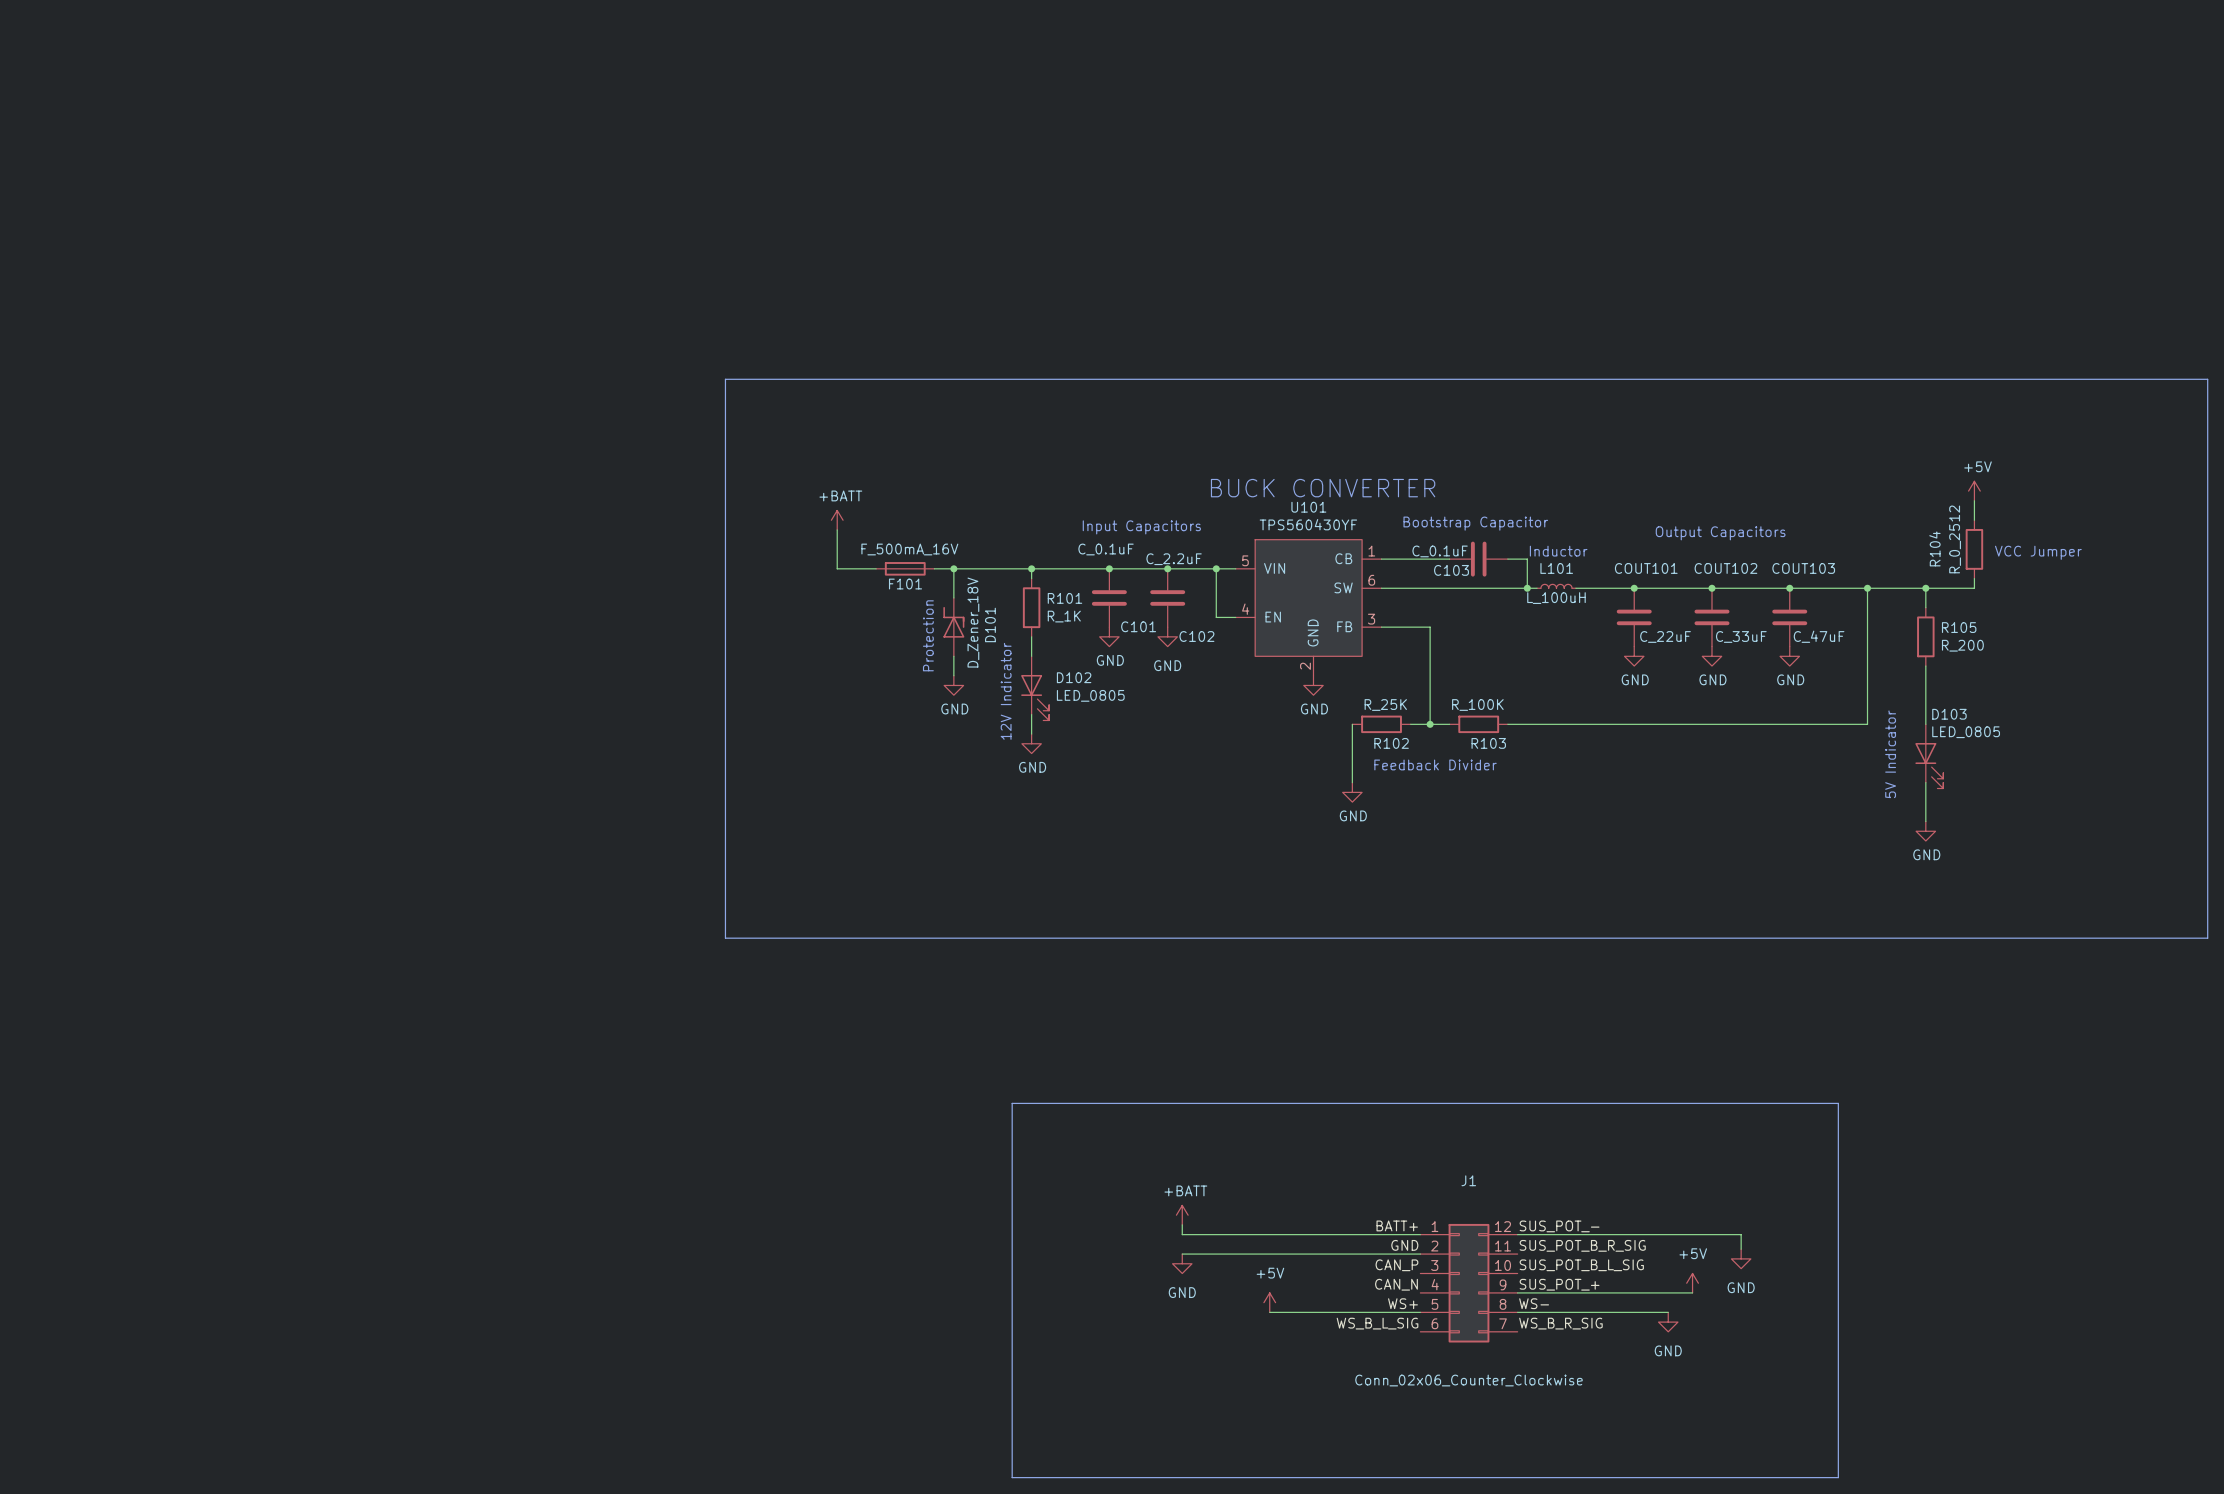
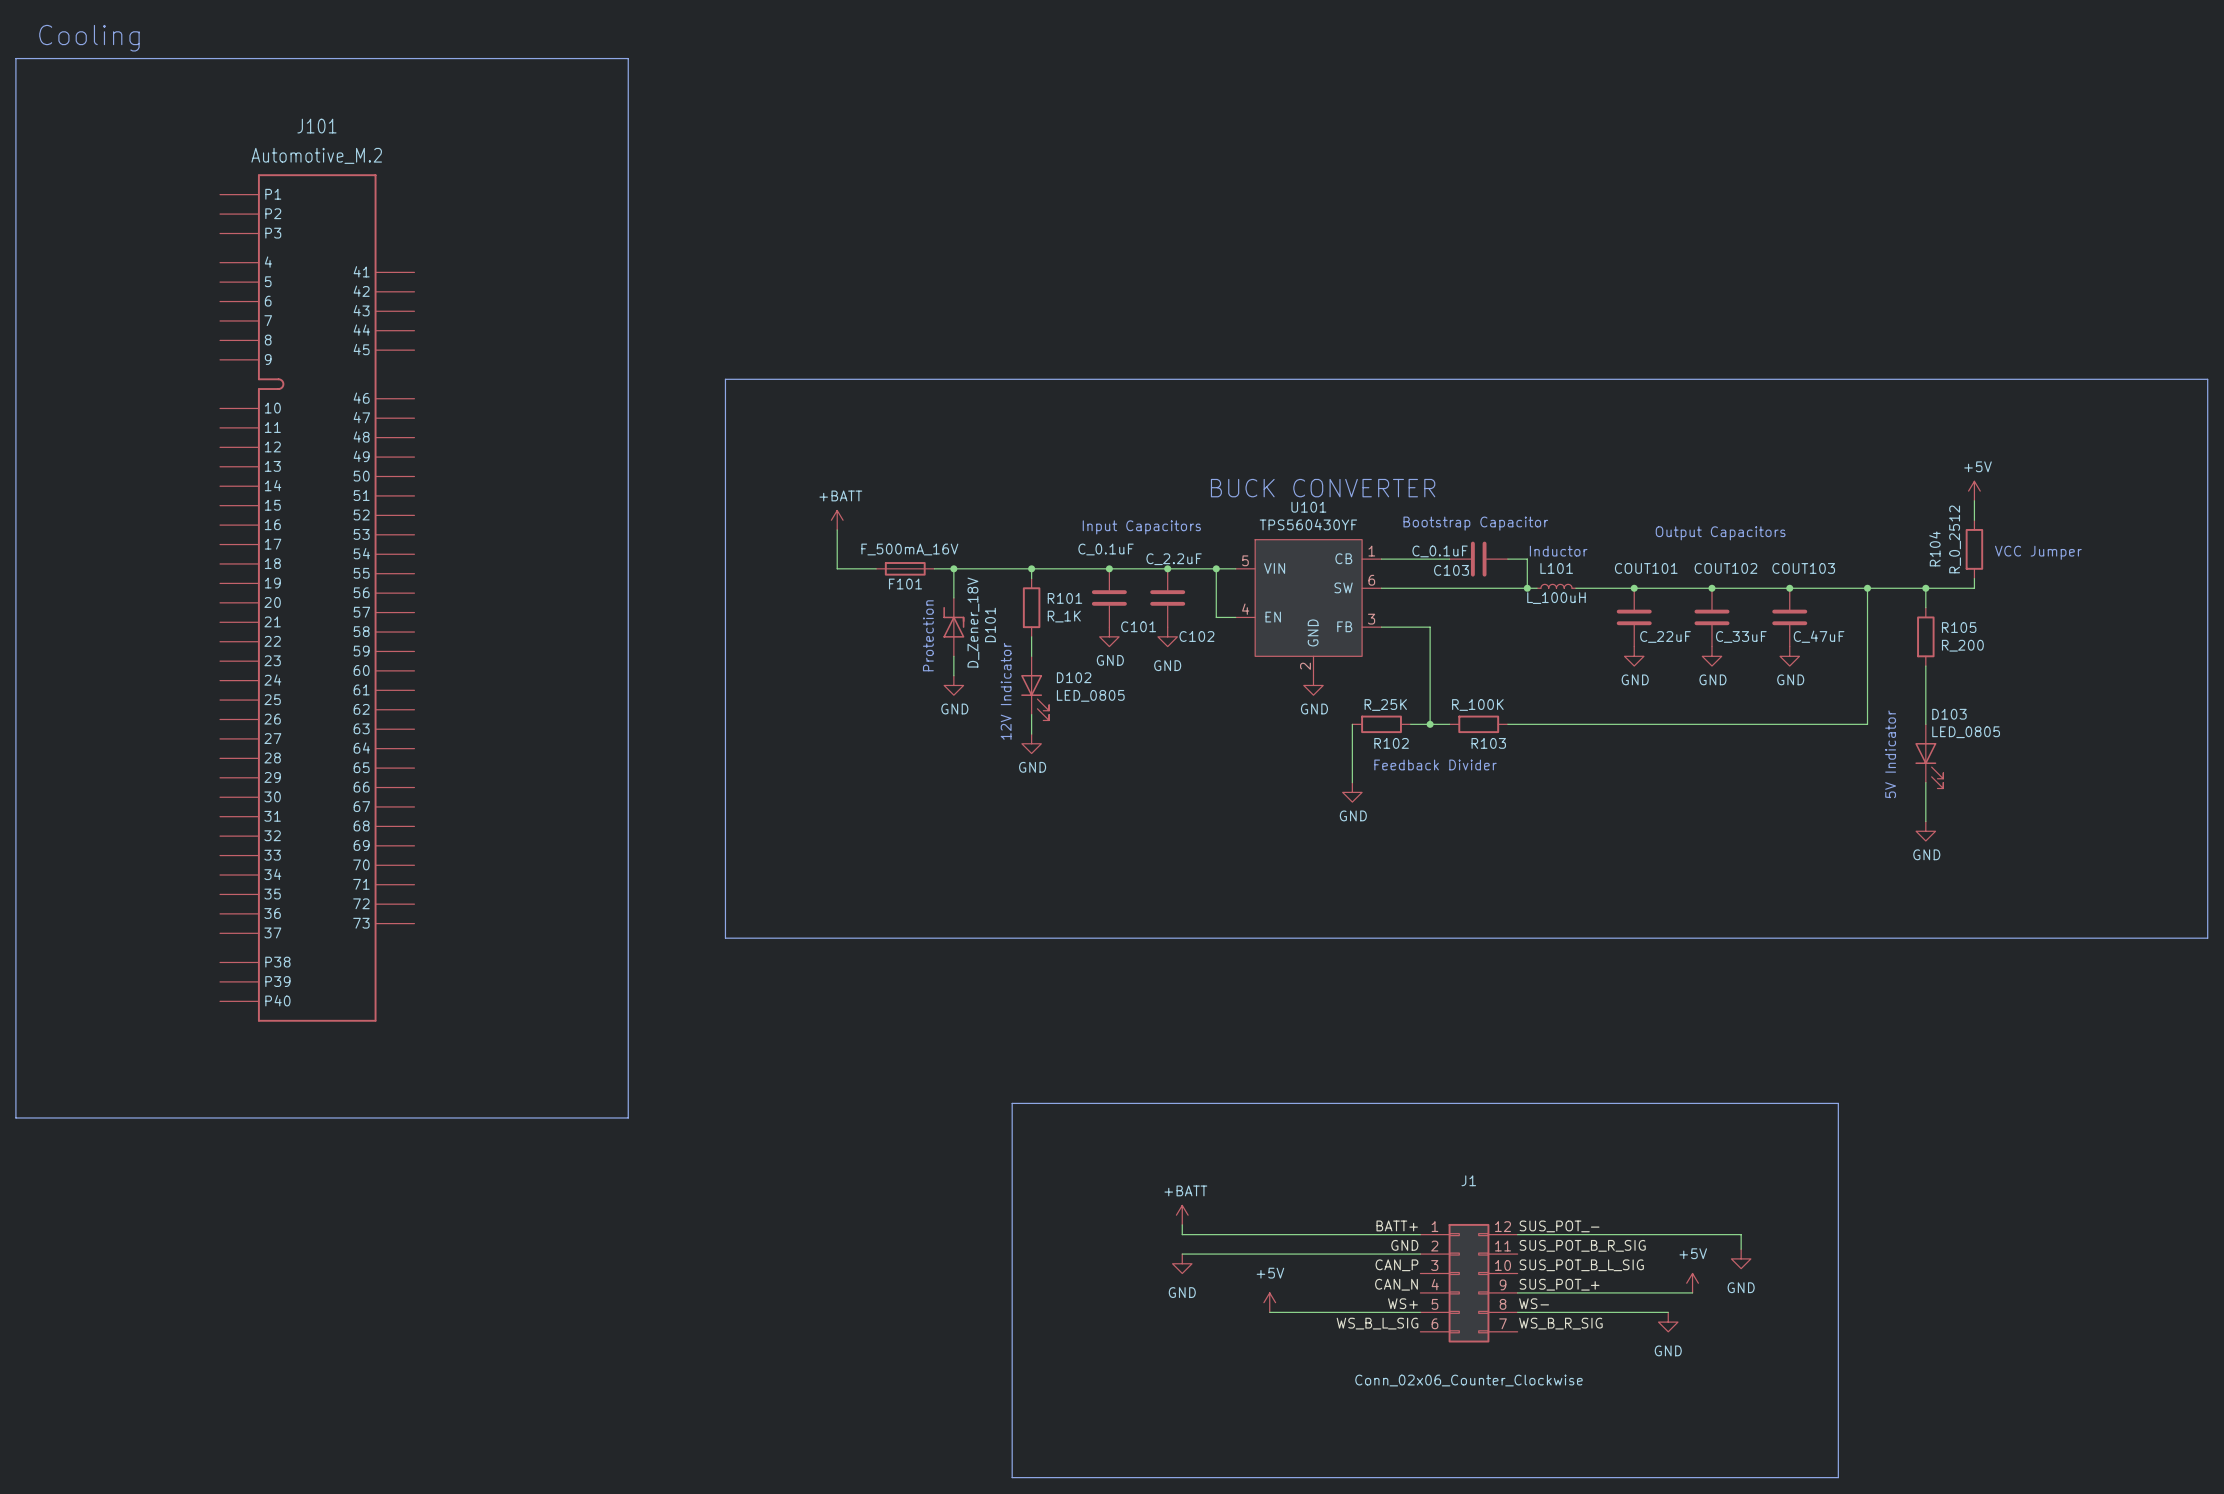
text: none -> Cooling (89, 38)
line: none -> (15, 58) (628, 58) (628, 1117) (15, 1117) (15, 58)
J101: none -> Automotive_M.2 (317, 597)

